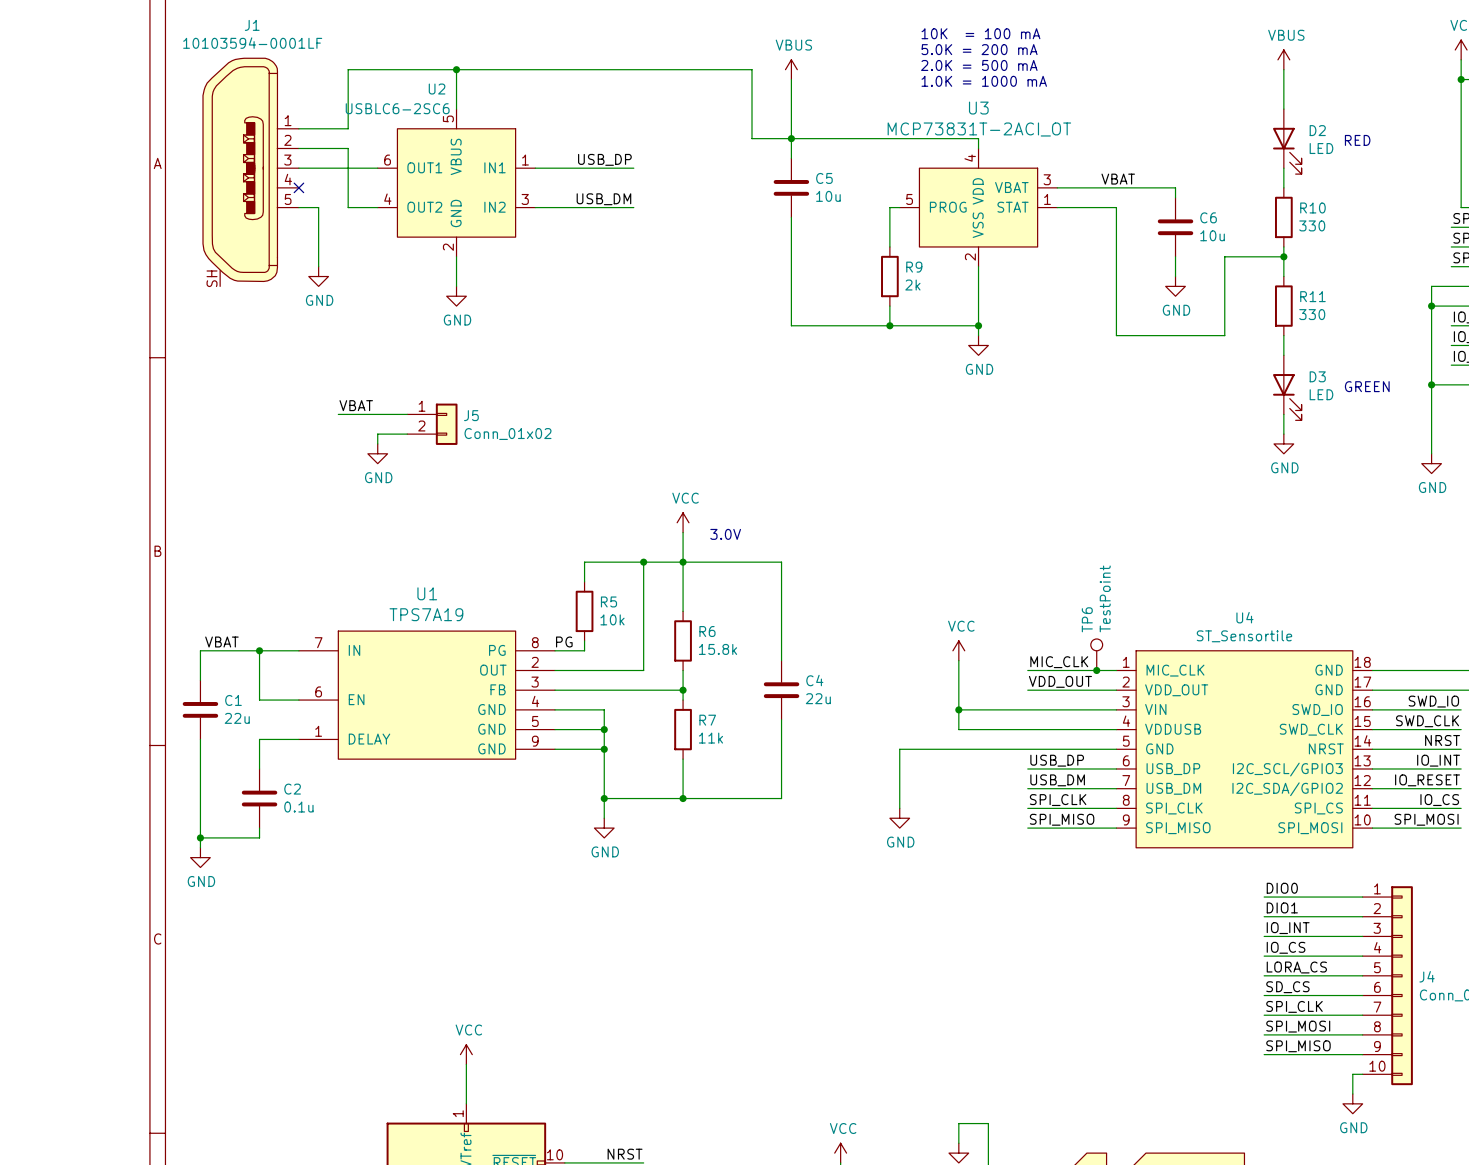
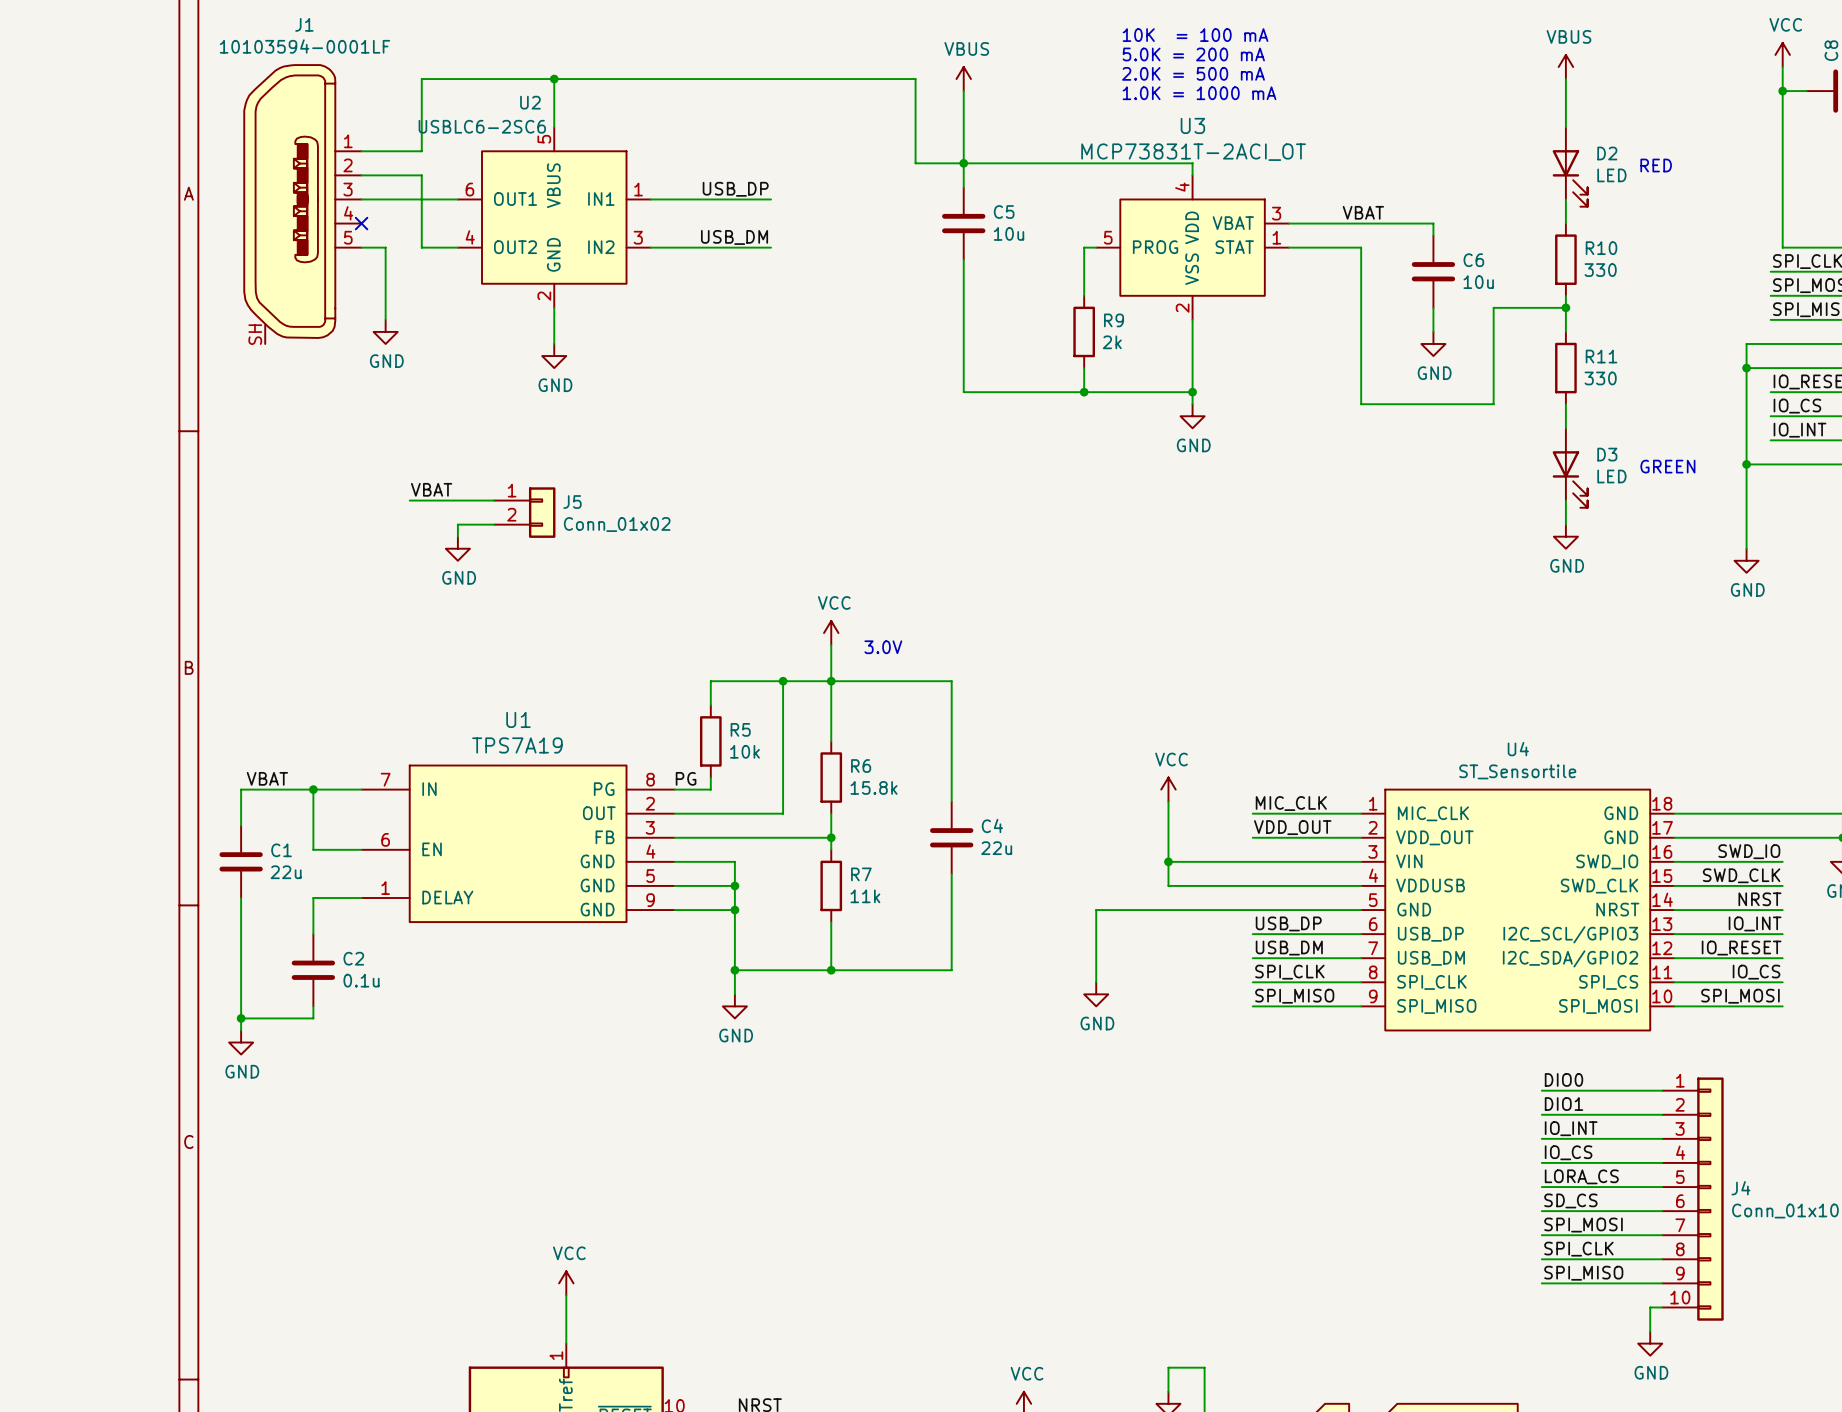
TP6: TestPoint (1096, 654) -> none
junction: (1096, 670) -> none
label: SPI_CLK (1294, 1006) -> SPI_MOSI (1583, 1225)
label: SPI_MOSI (1298, 1026) -> SPI_CLK (1578, 1249)

